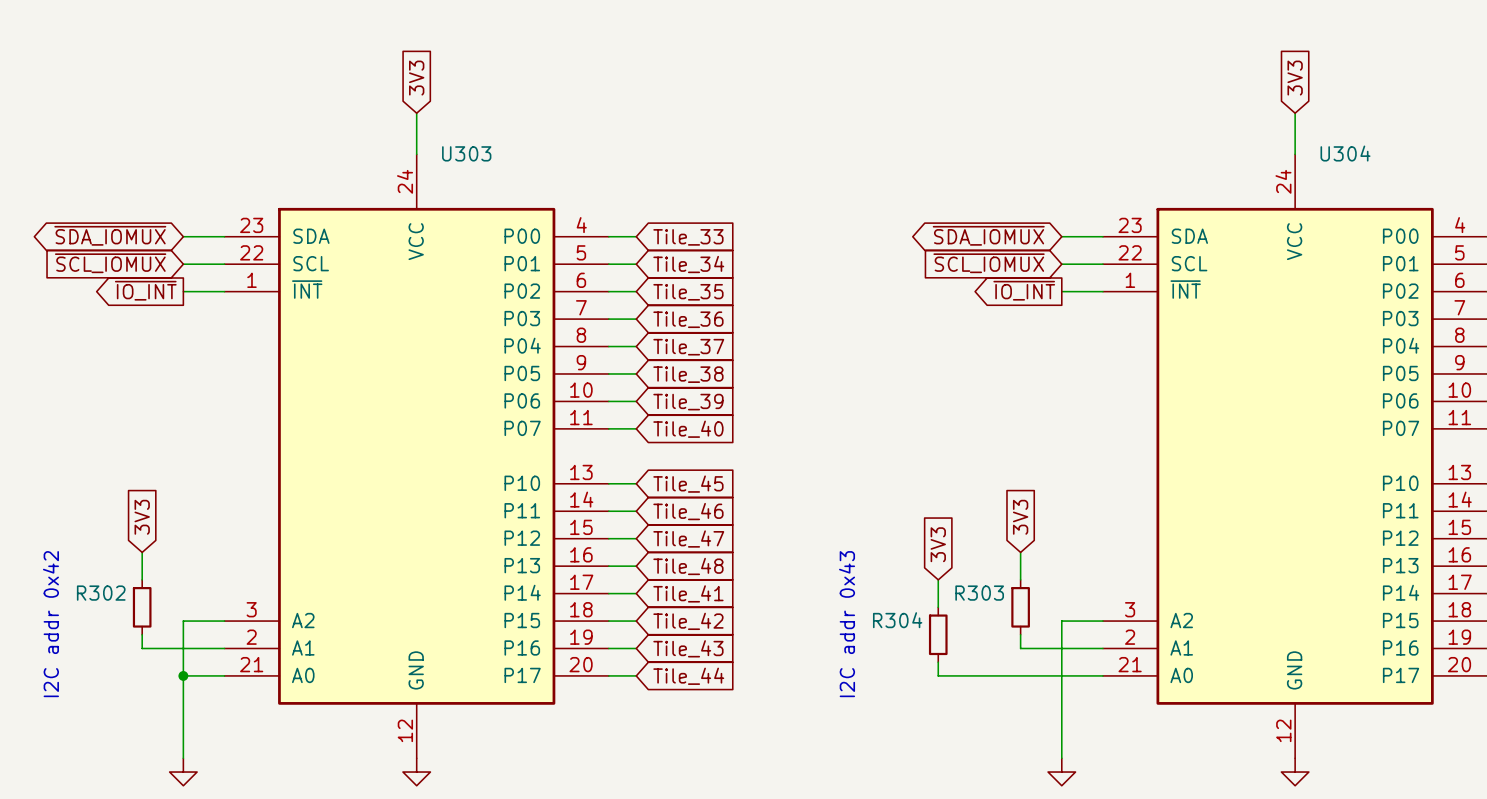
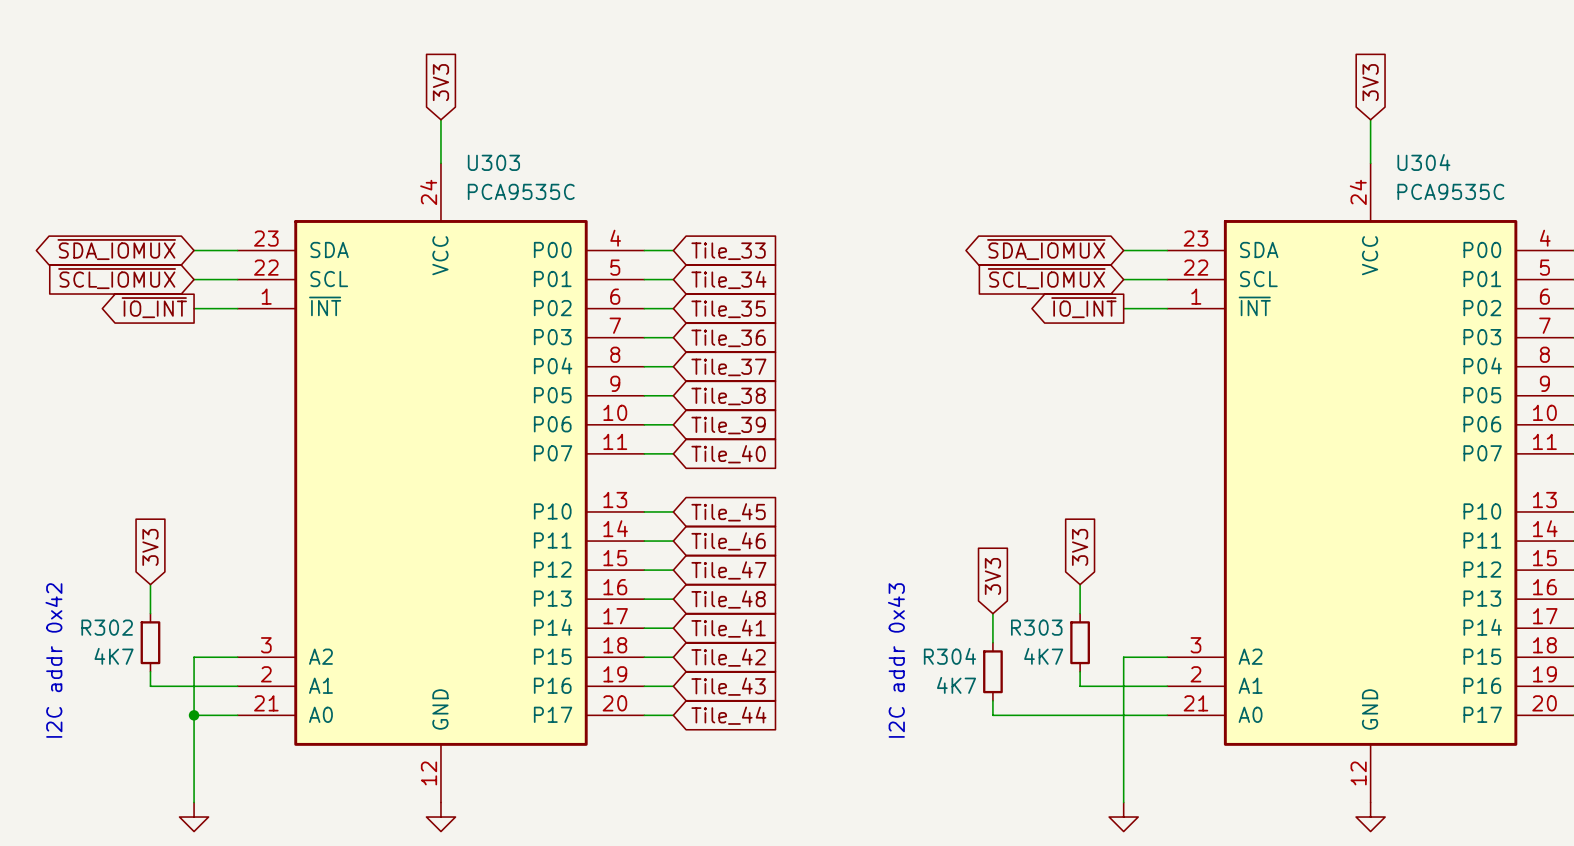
U303 value: none -> PCA9535C (521, 191)
U304 value: none -> PCA9535C (1450, 191)
R302 value: none -> 4K7 (114, 656)
R303 value: none -> 4K7 (1043, 656)
R304 value: none -> 4K7 (956, 685)

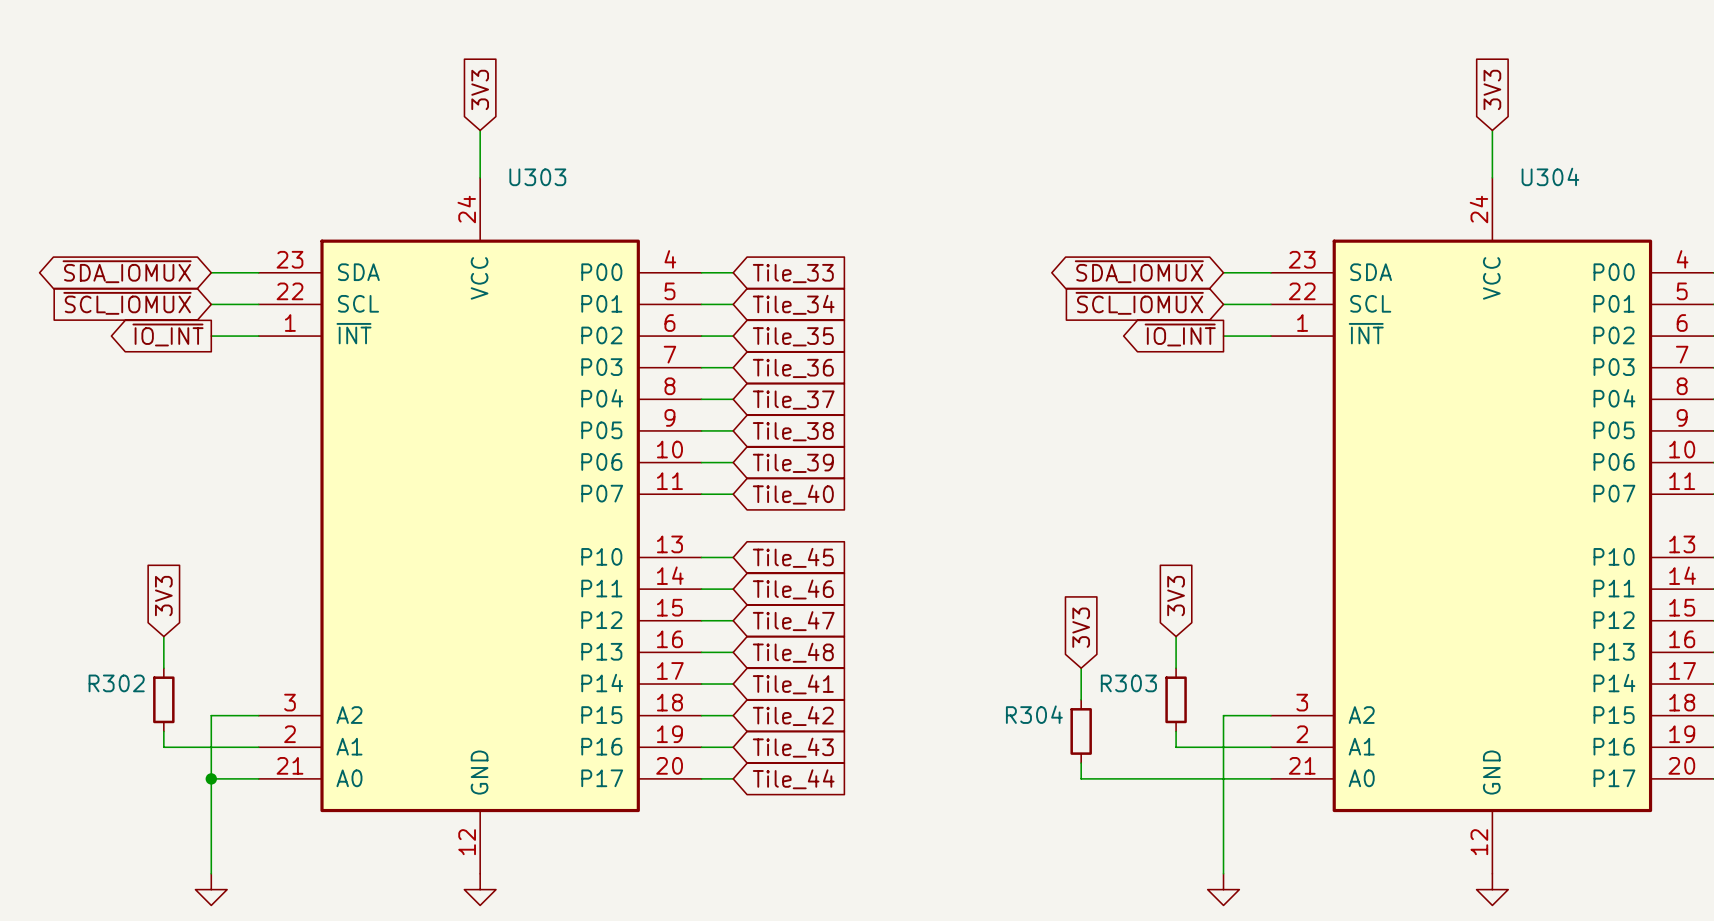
U303 value: PCA9535C (521, 191) -> none
U304 value: PCA9535C (1450, 191) -> none
R302 value: 4K7 (114, 656) -> none
R303 value: 4K7 (1043, 656) -> none
text: I2C addr 0x42 (53, 660) -> none
text: I2C addr 0x43 (896, 660) -> none
R304 value: 4K7 (956, 685) -> none

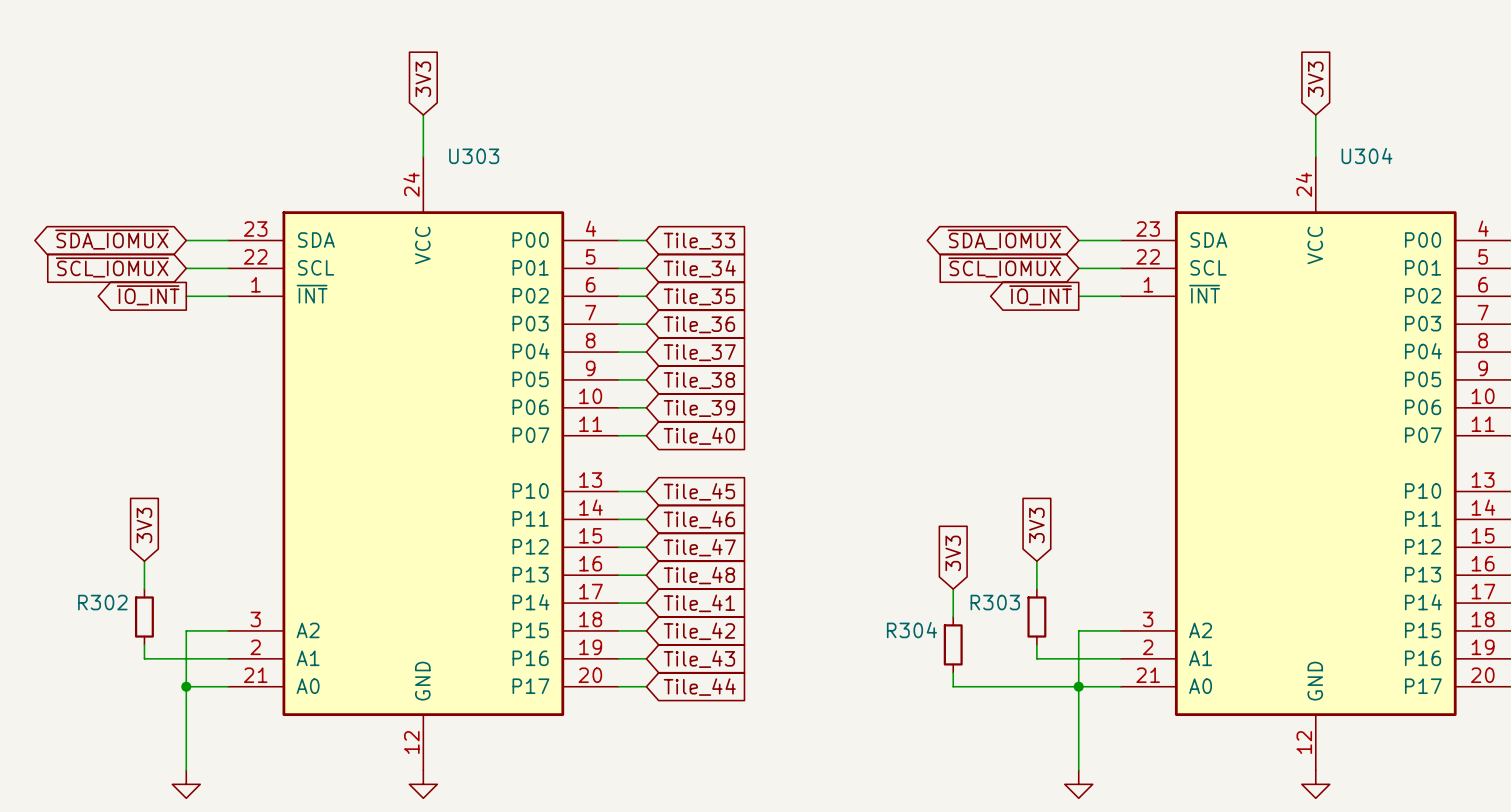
junction: none -> (1078, 686)

